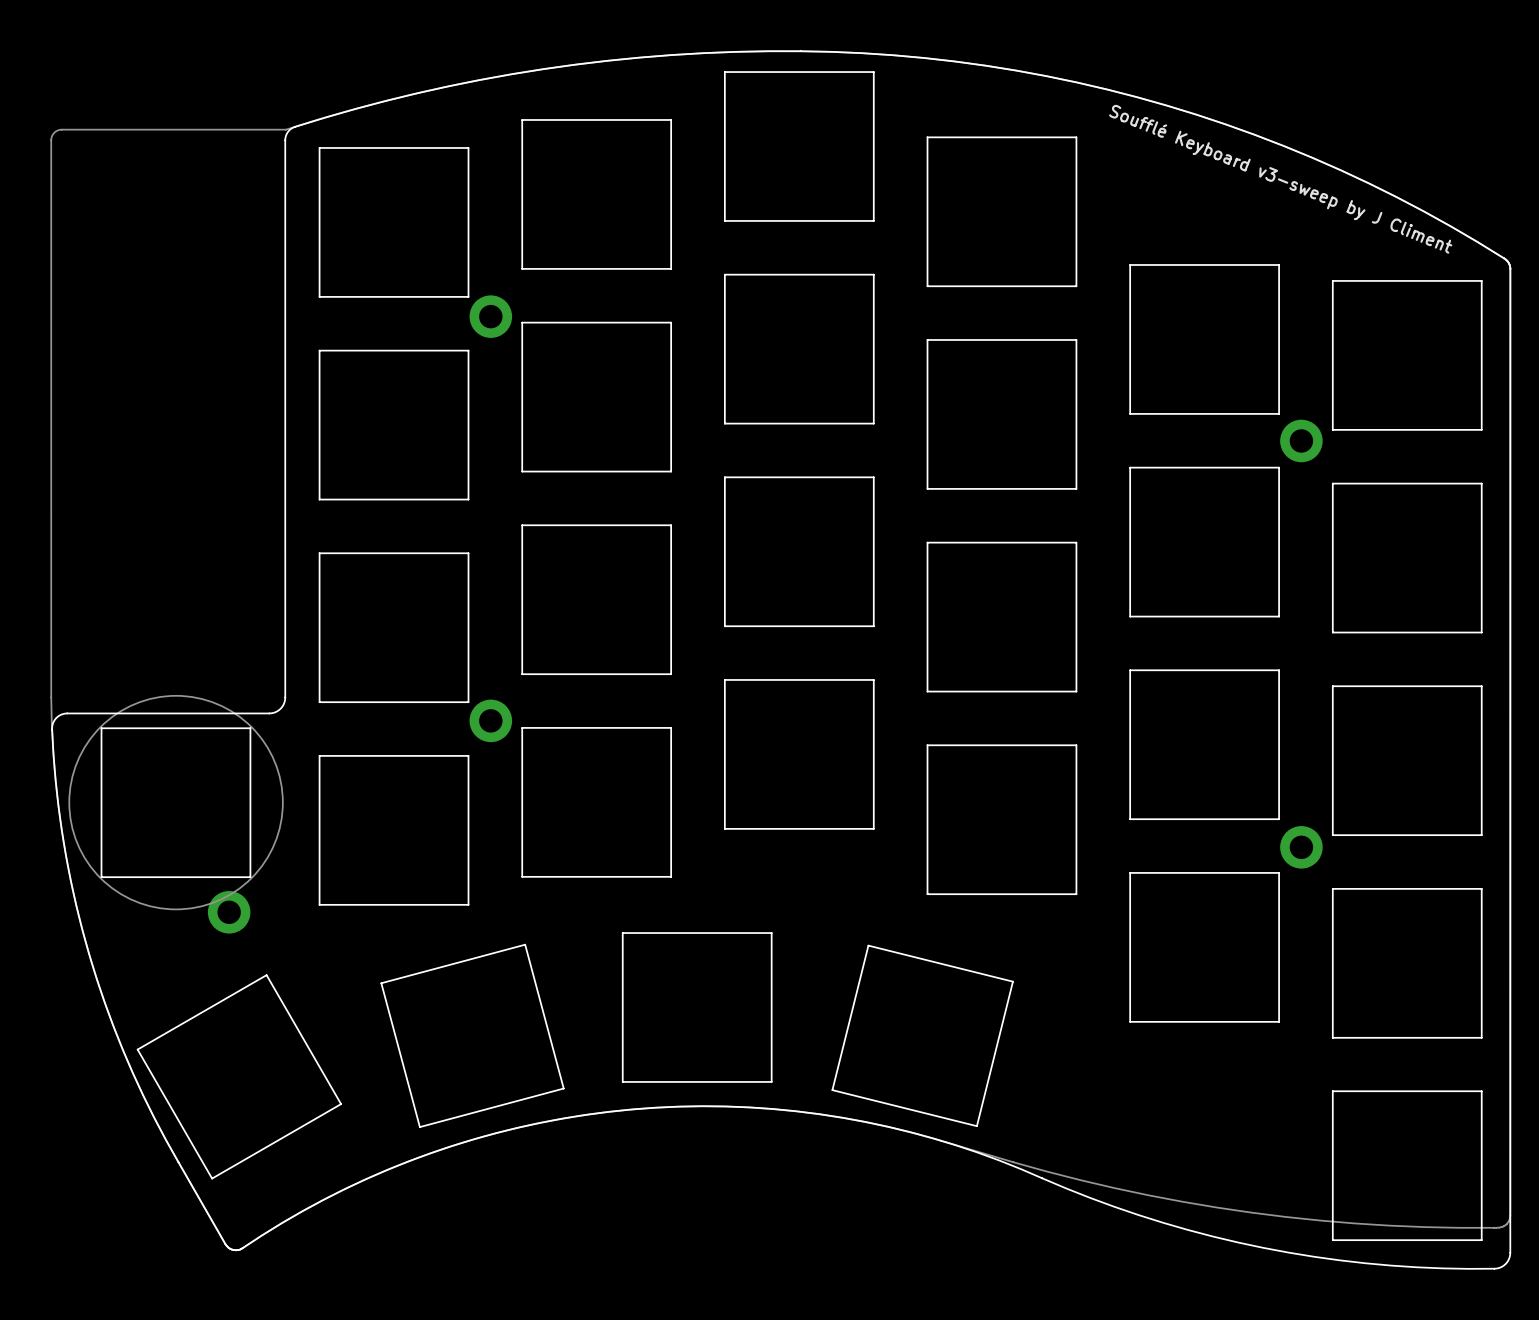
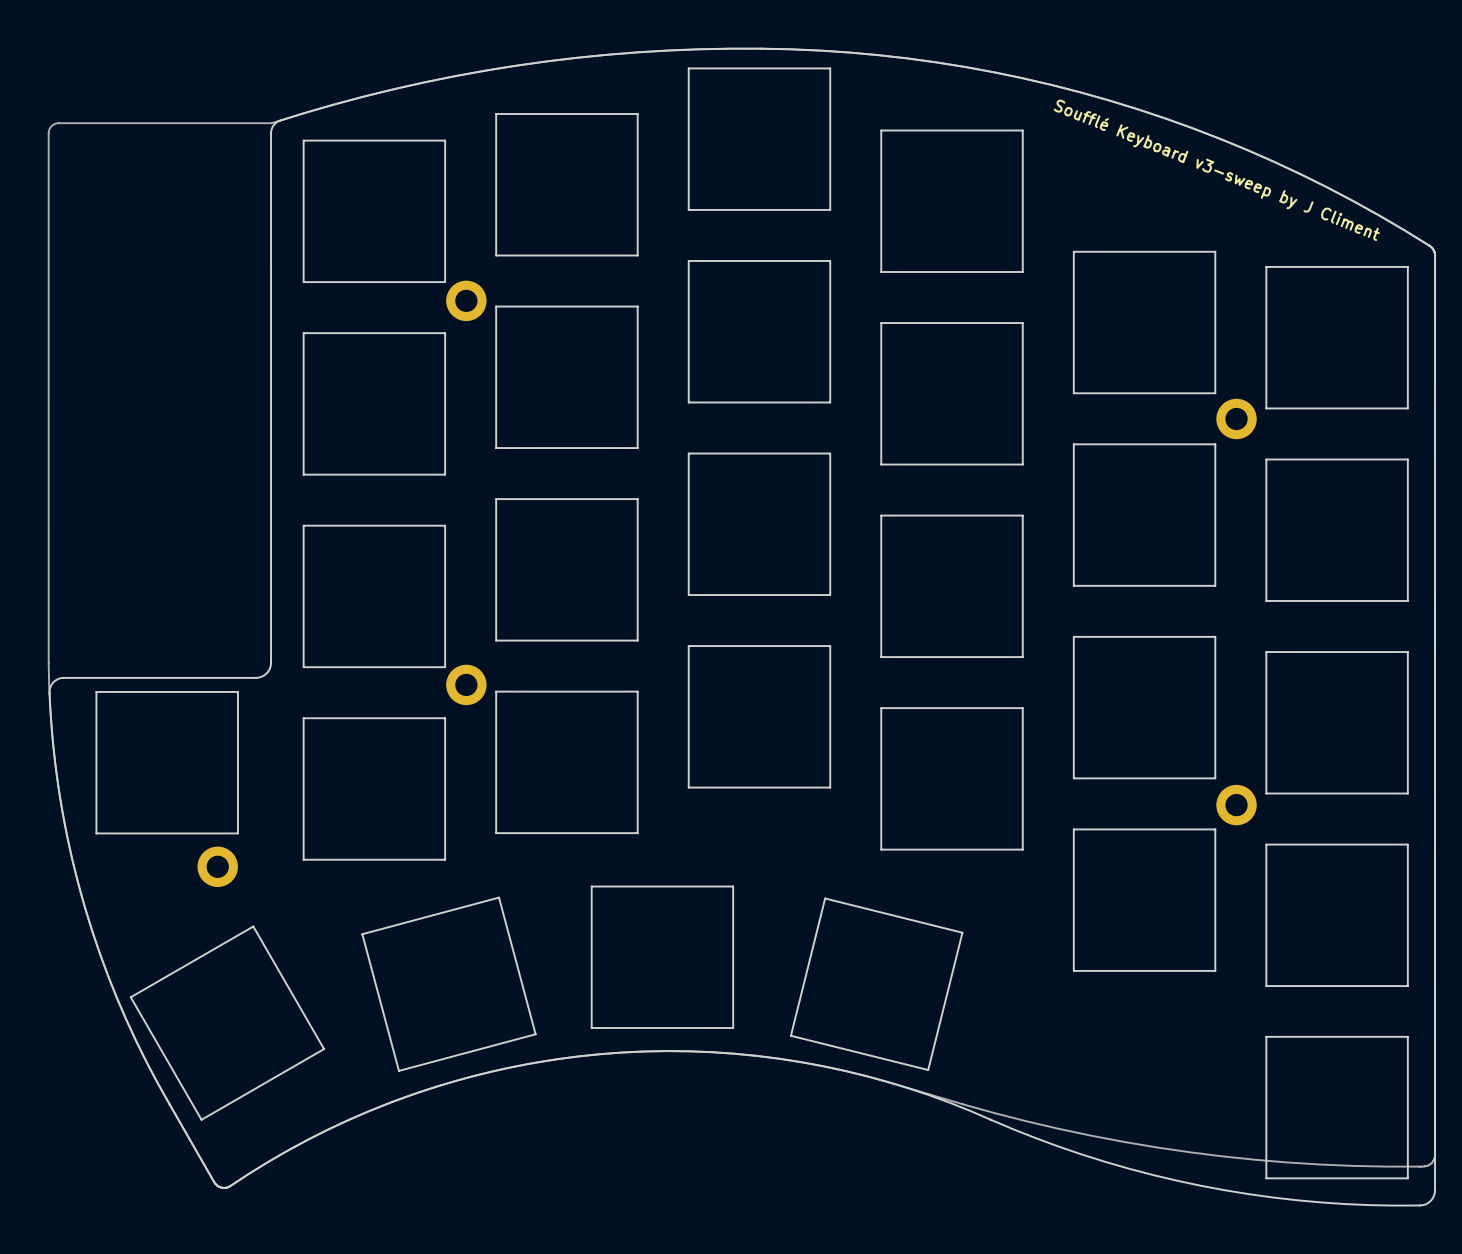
drawing: [68, 695, 284, 911] -> none

